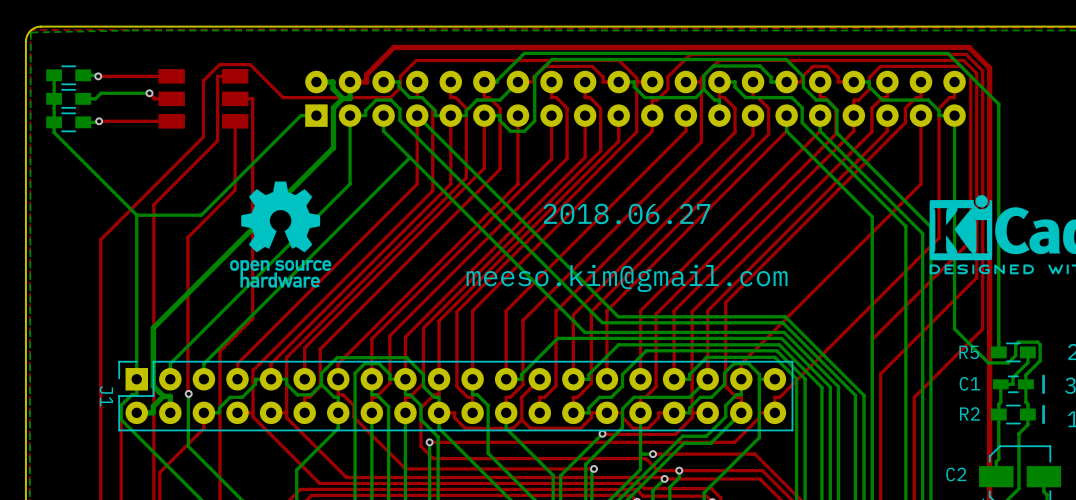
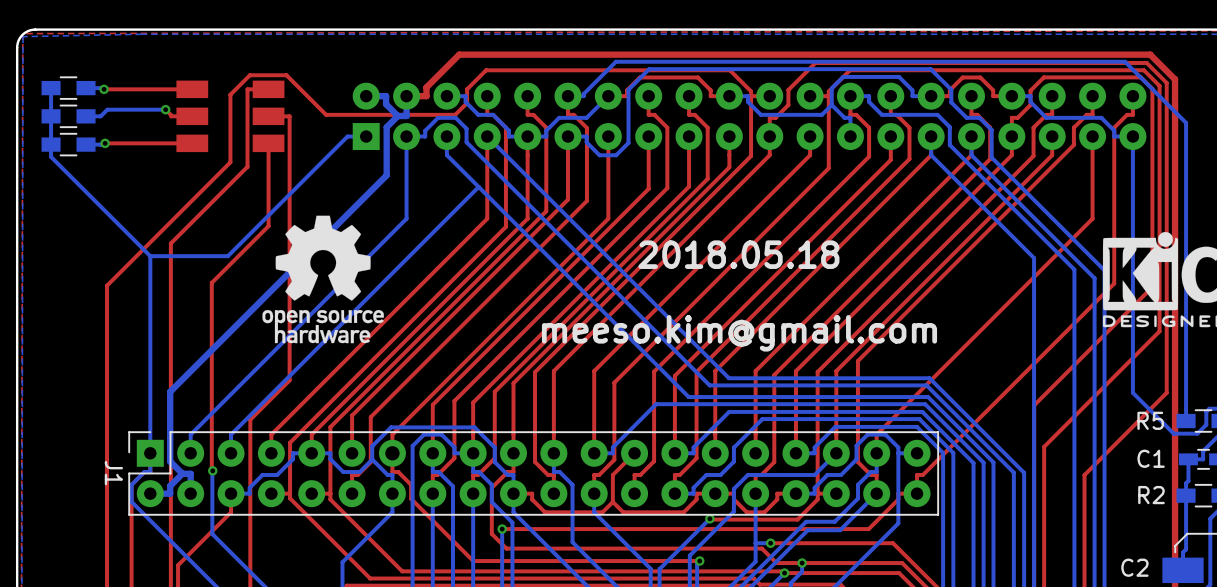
text: 2018.06.27 (627, 213) -> 2018.05.18 (738, 254)

